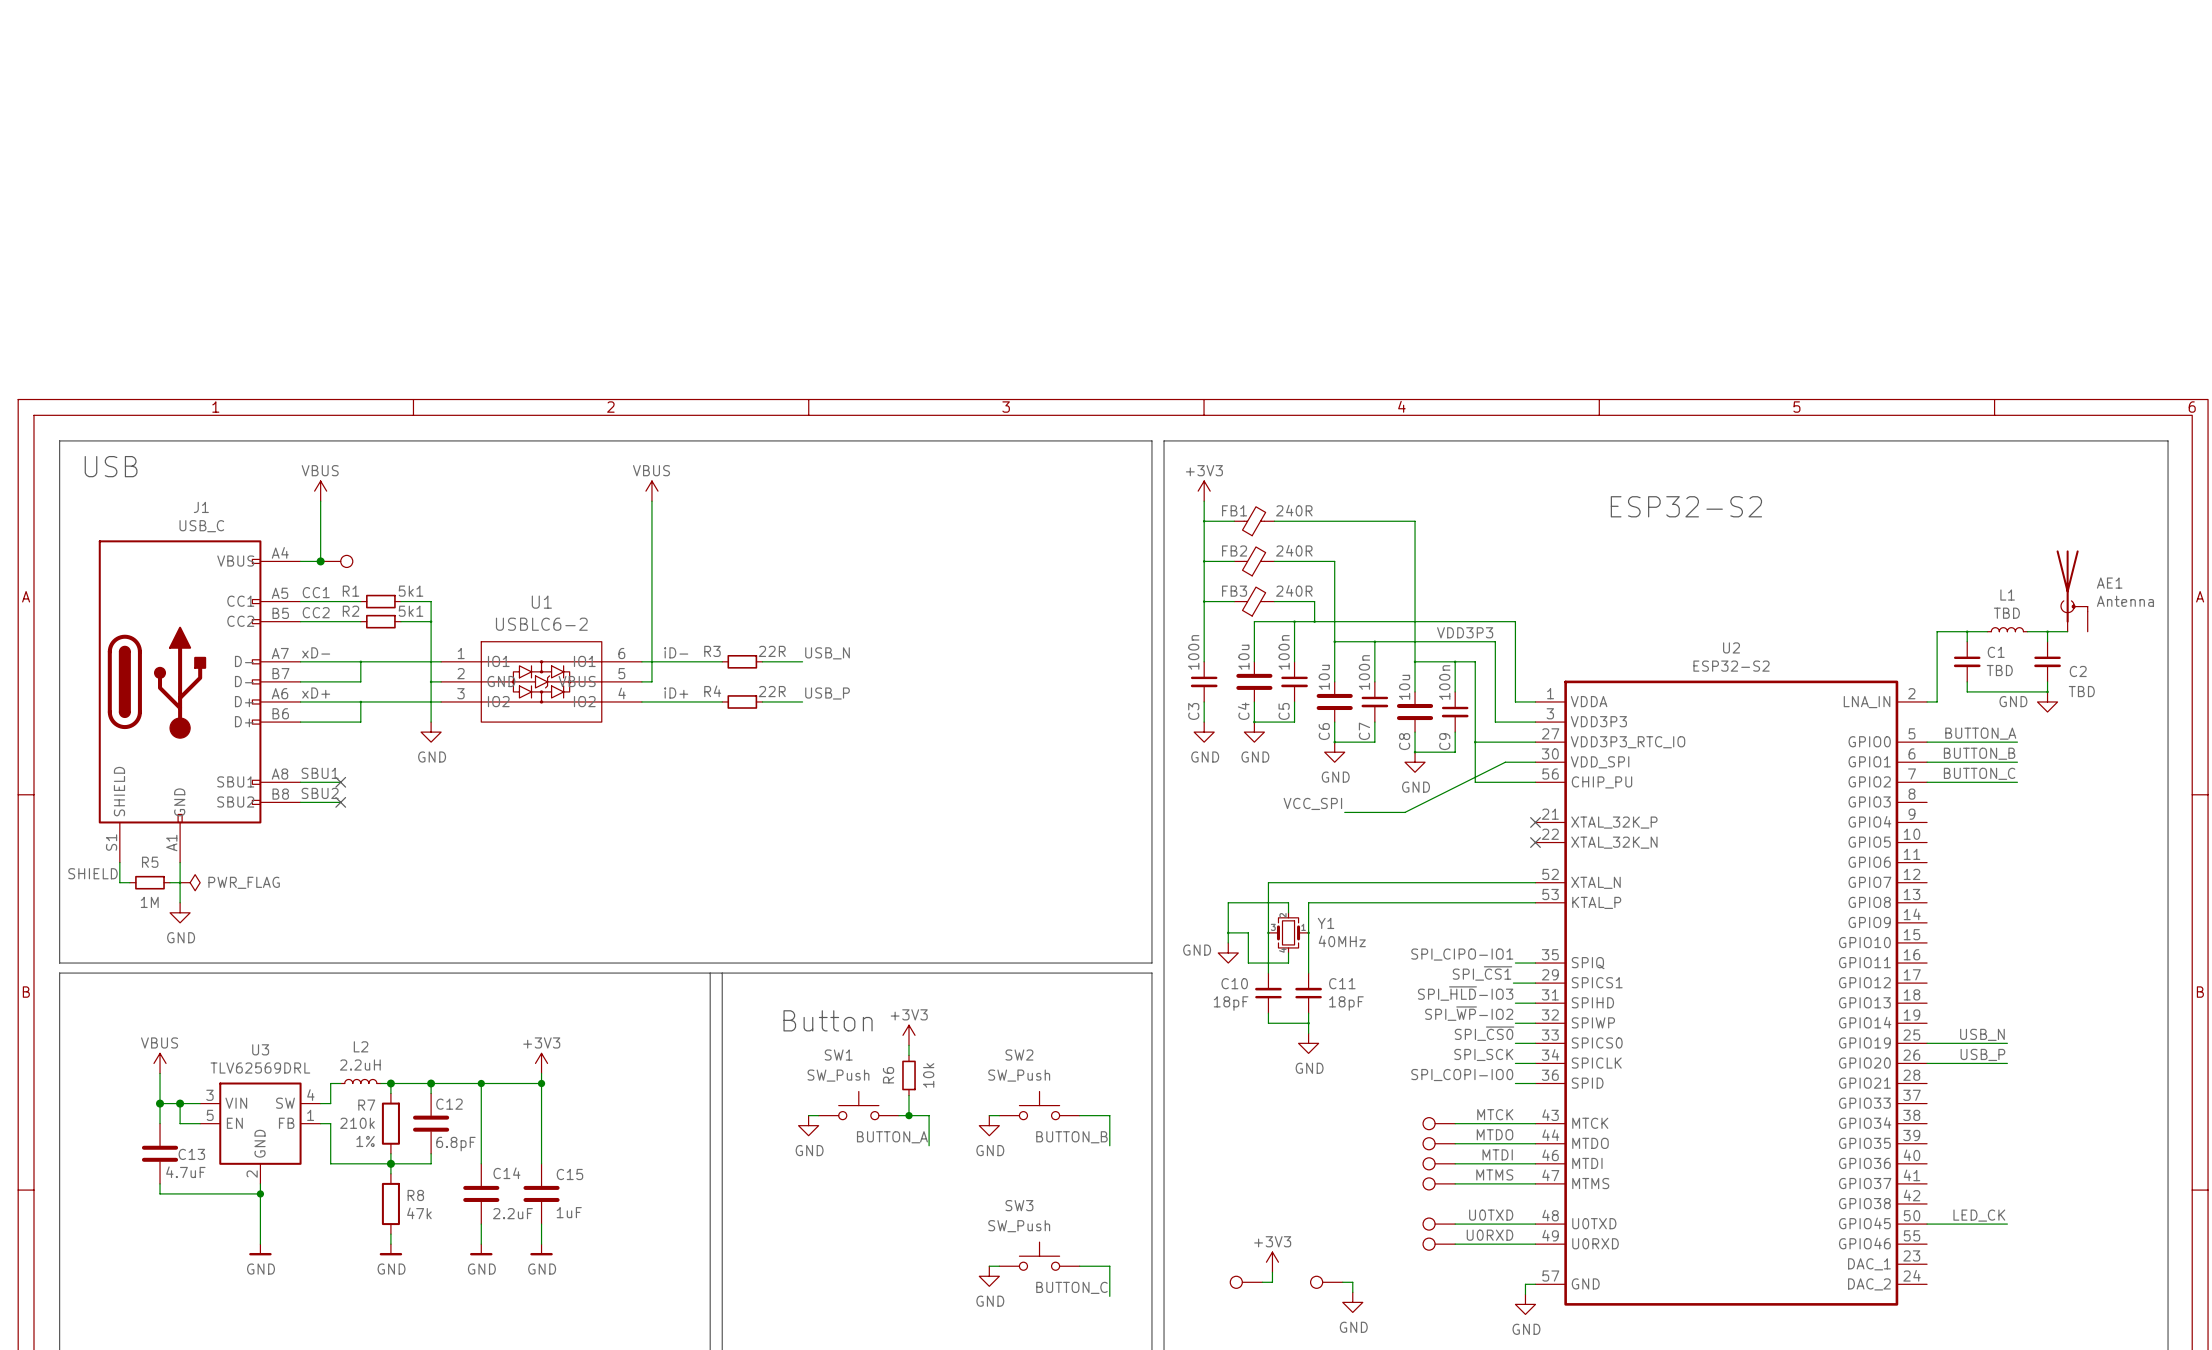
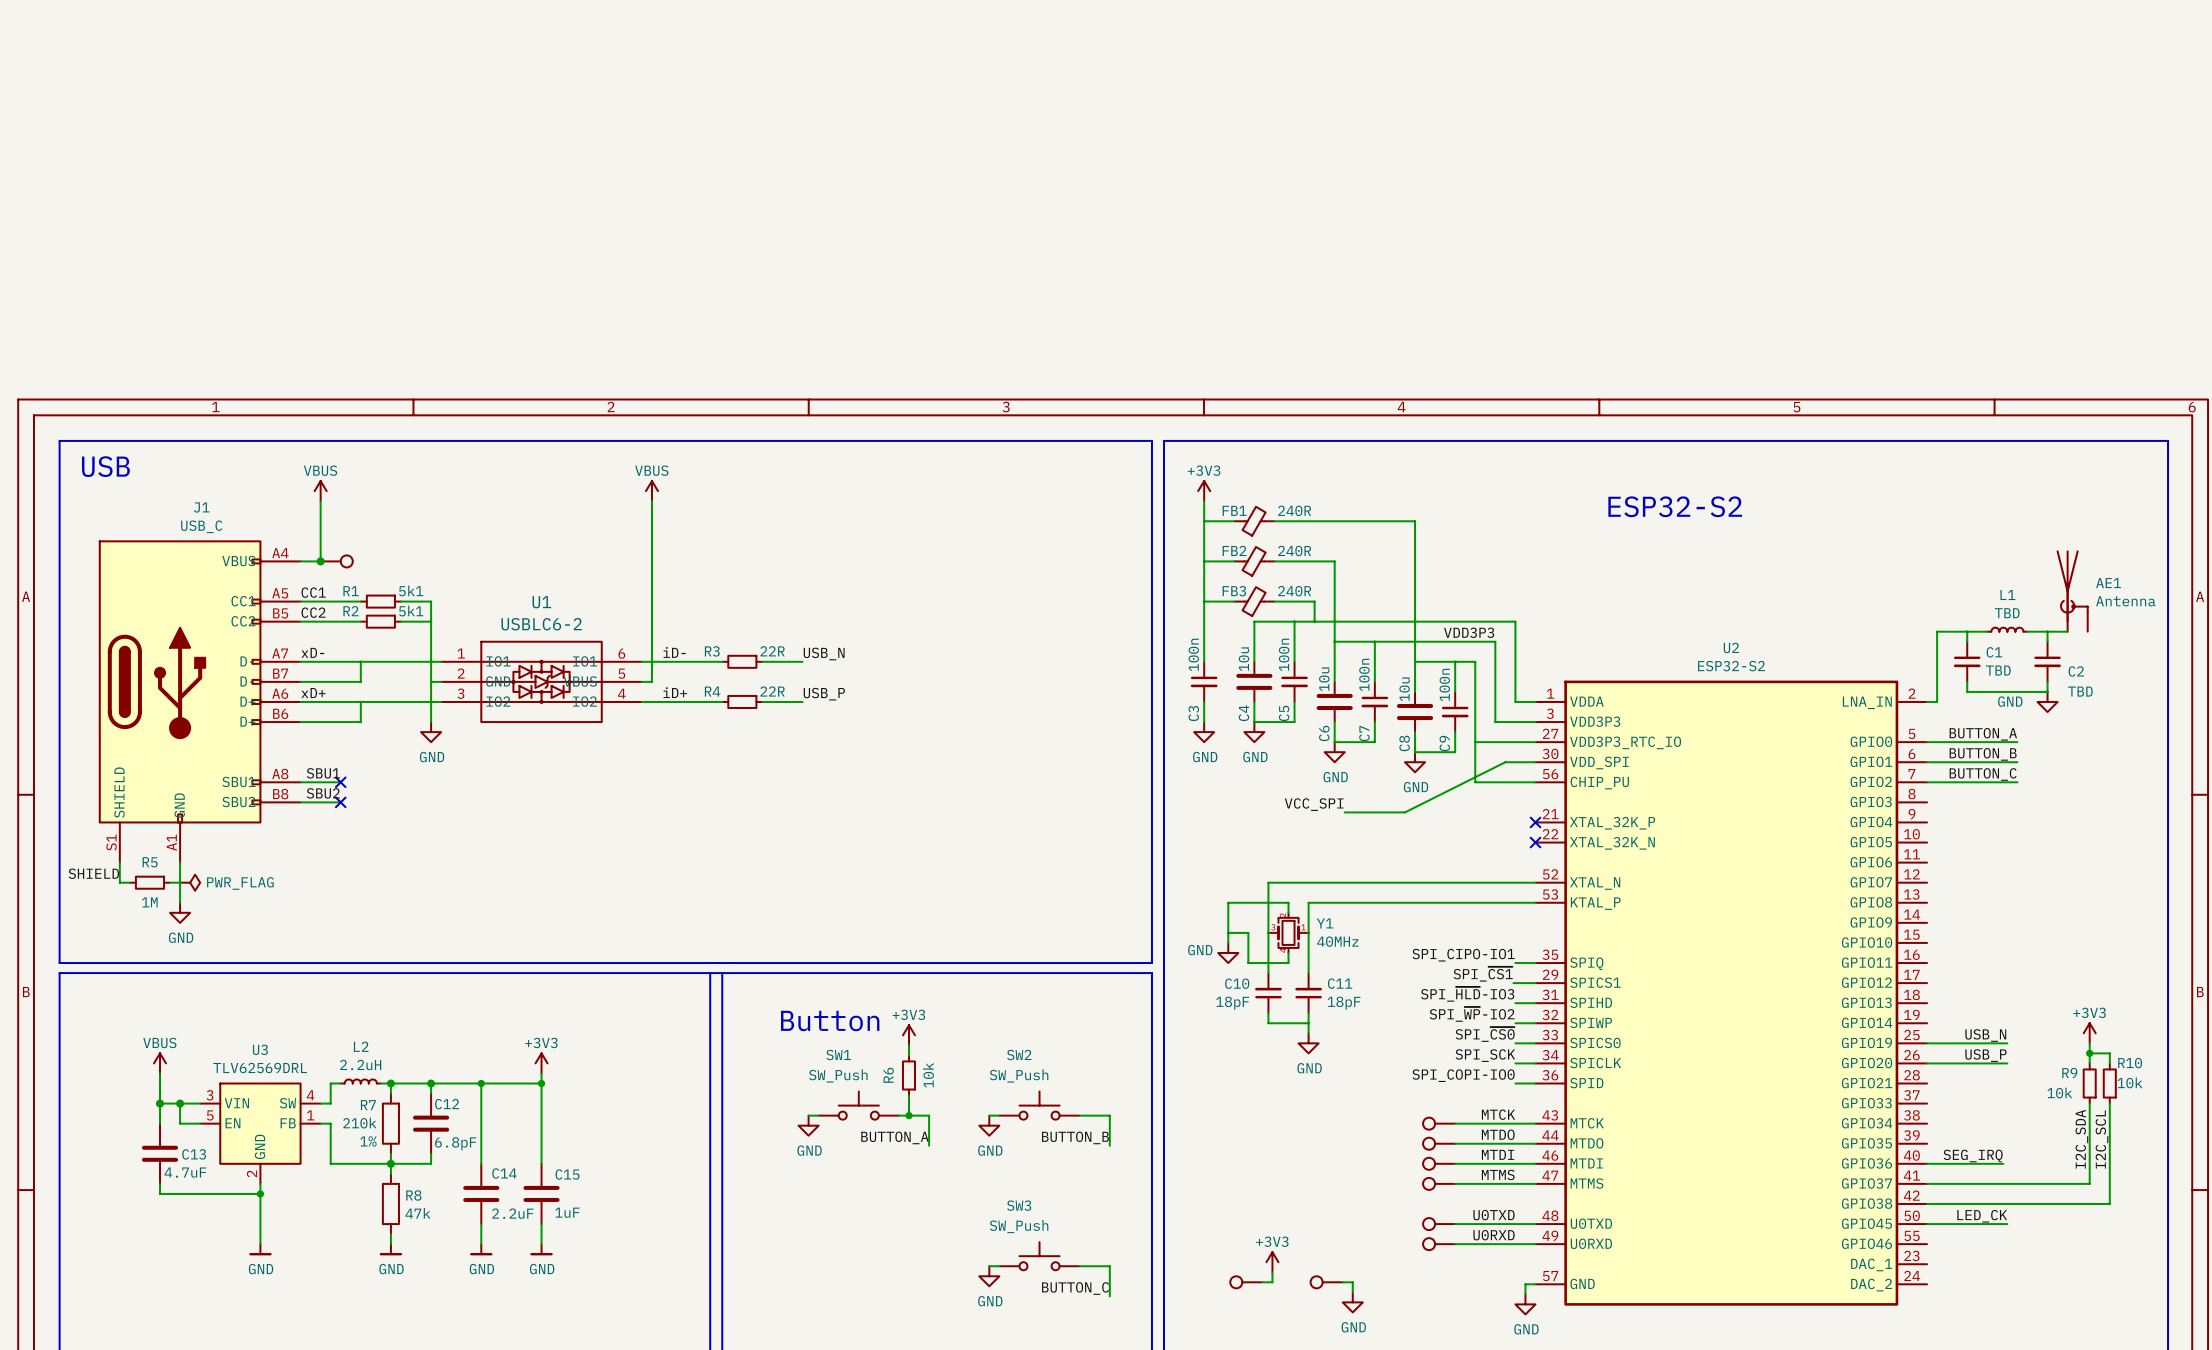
power symbol: none -> +3V3 (2089, 1033)
wire: none -> (2089, 1043) (2089, 1063)
wire: none -> (2089, 1053) (2109, 1053) (2109, 1063)
junction: none -> (2089, 1053)
R9: none -> 10k (2089, 1083)
R10: none -> 10k (2109, 1083)
wire: none -> (2089, 1103) (2089, 1183) (1927, 1183)
wire: none -> (2109, 1103) (2109, 1203) (1927, 1203)
label: none -> I2C_SDA (2081, 1139)
label: none -> I2C_SCL (2101, 1139)
label: none -> SEG_IRQ (1973, 1155)
wire: none -> (1927, 1163) (2003, 1163)

